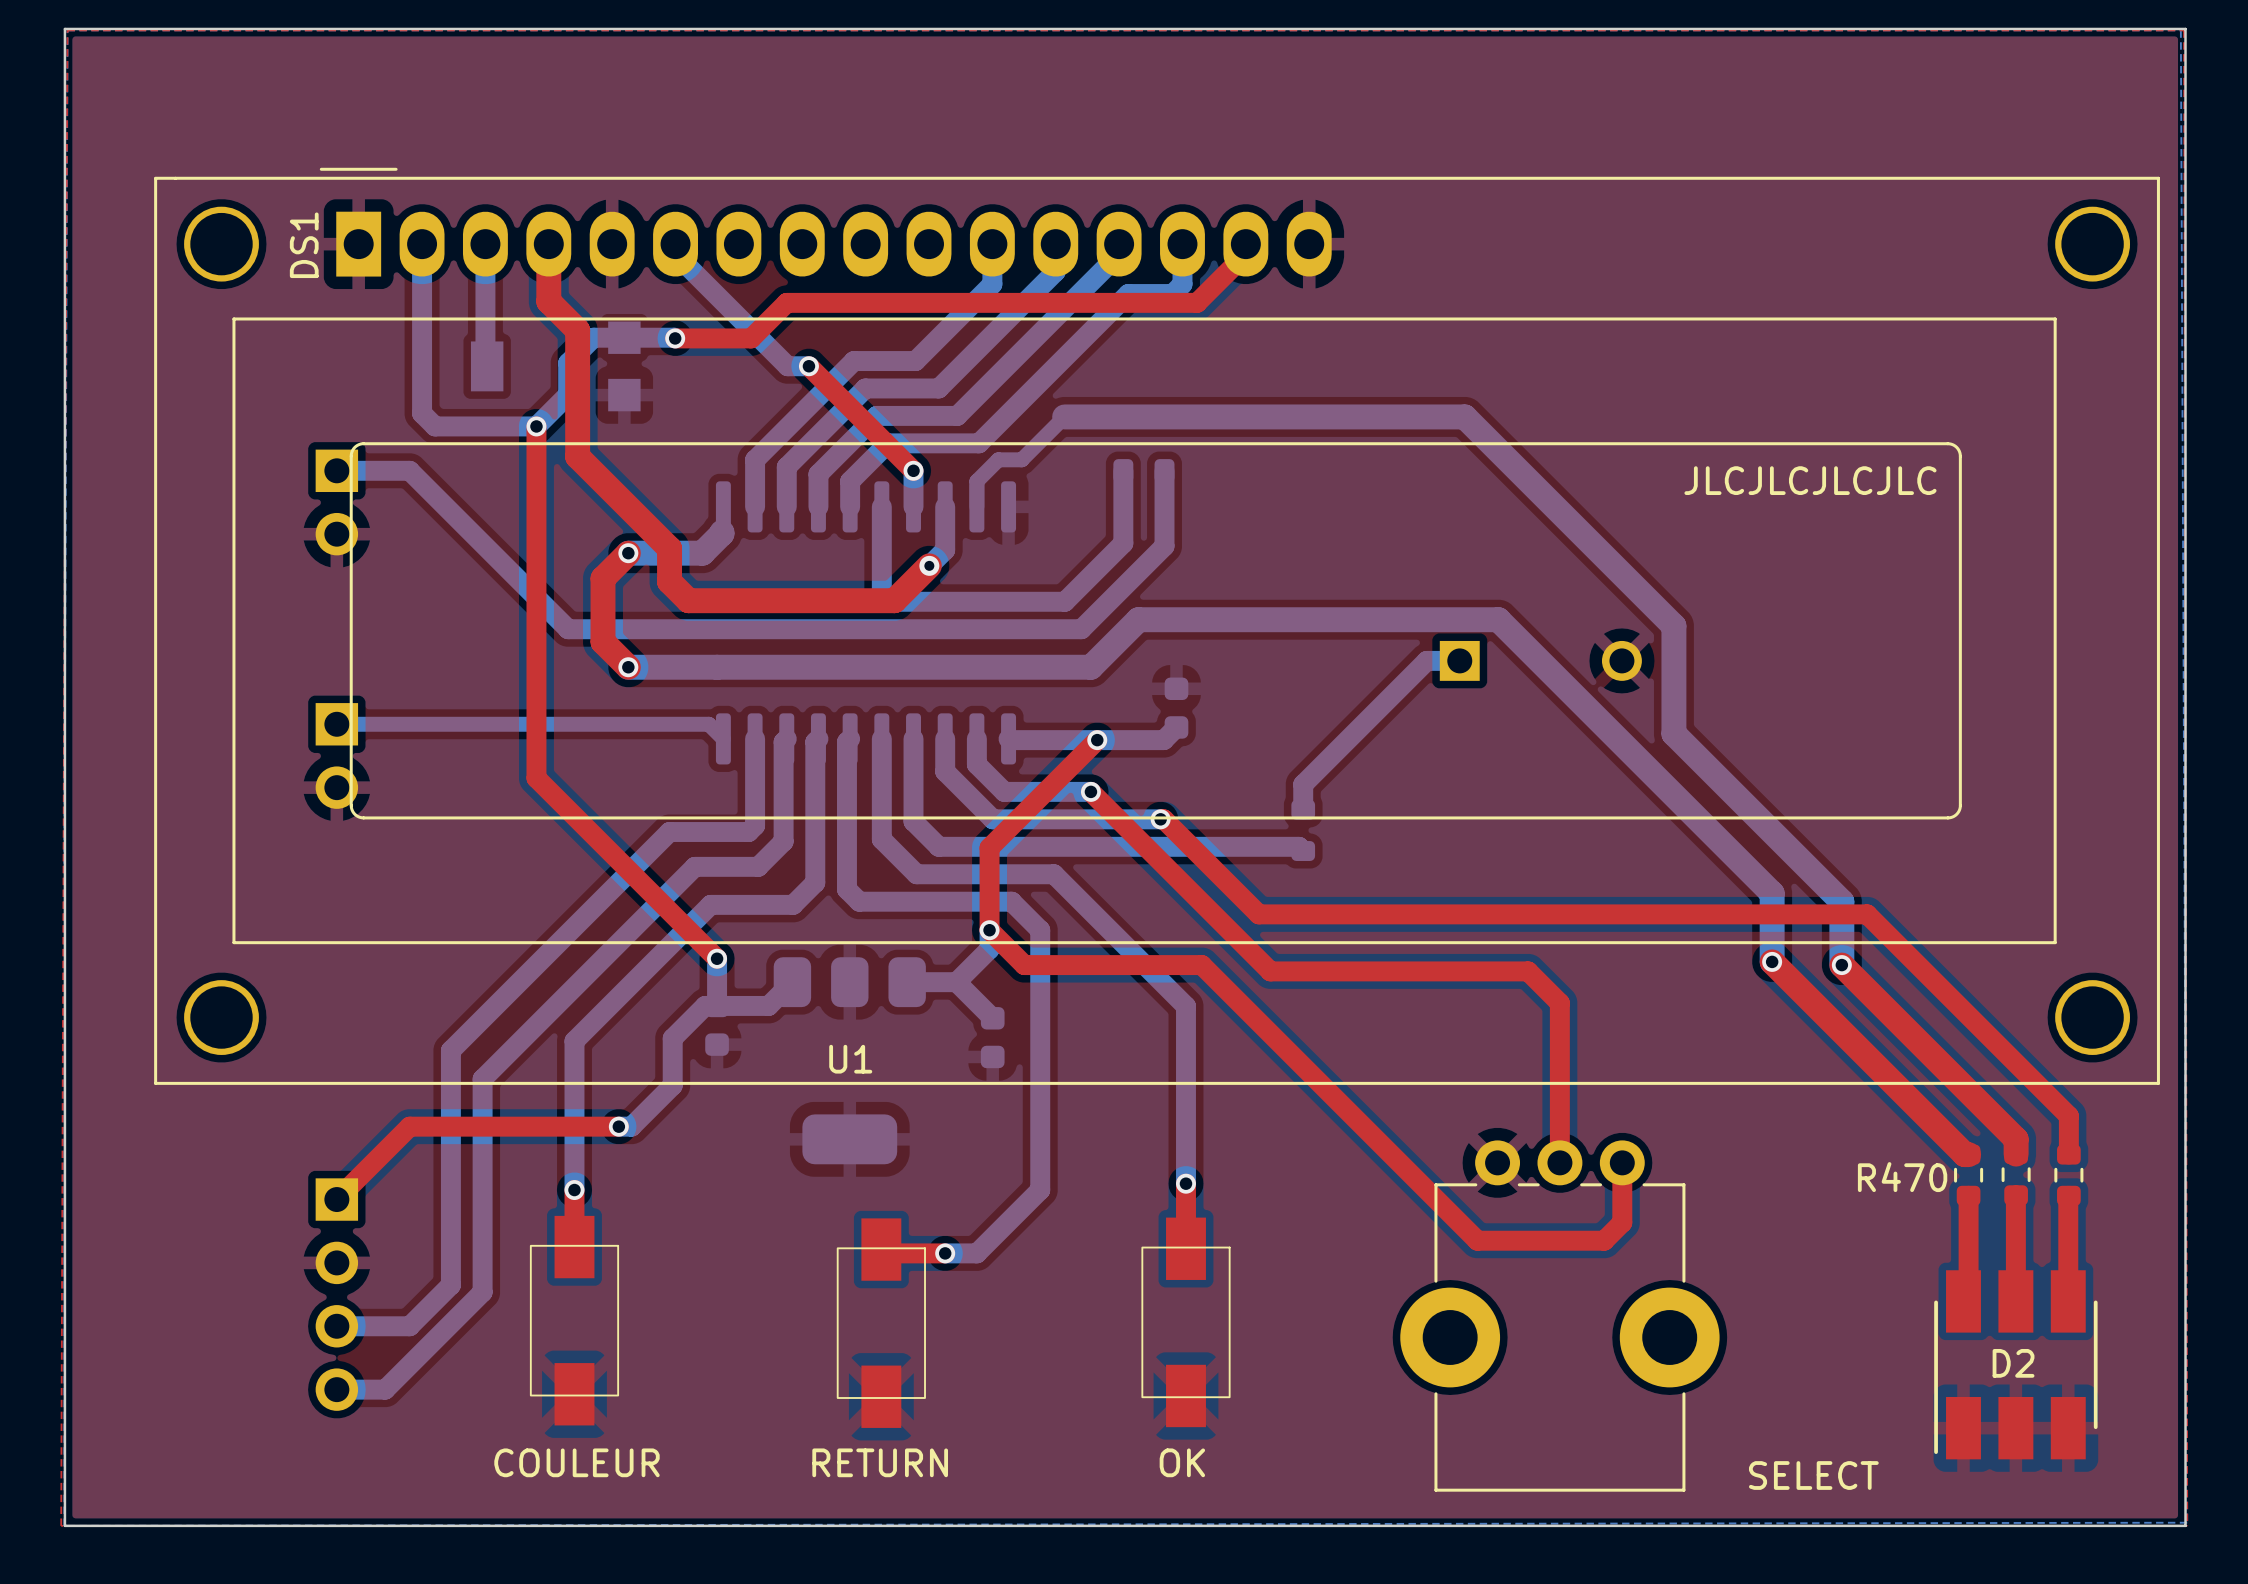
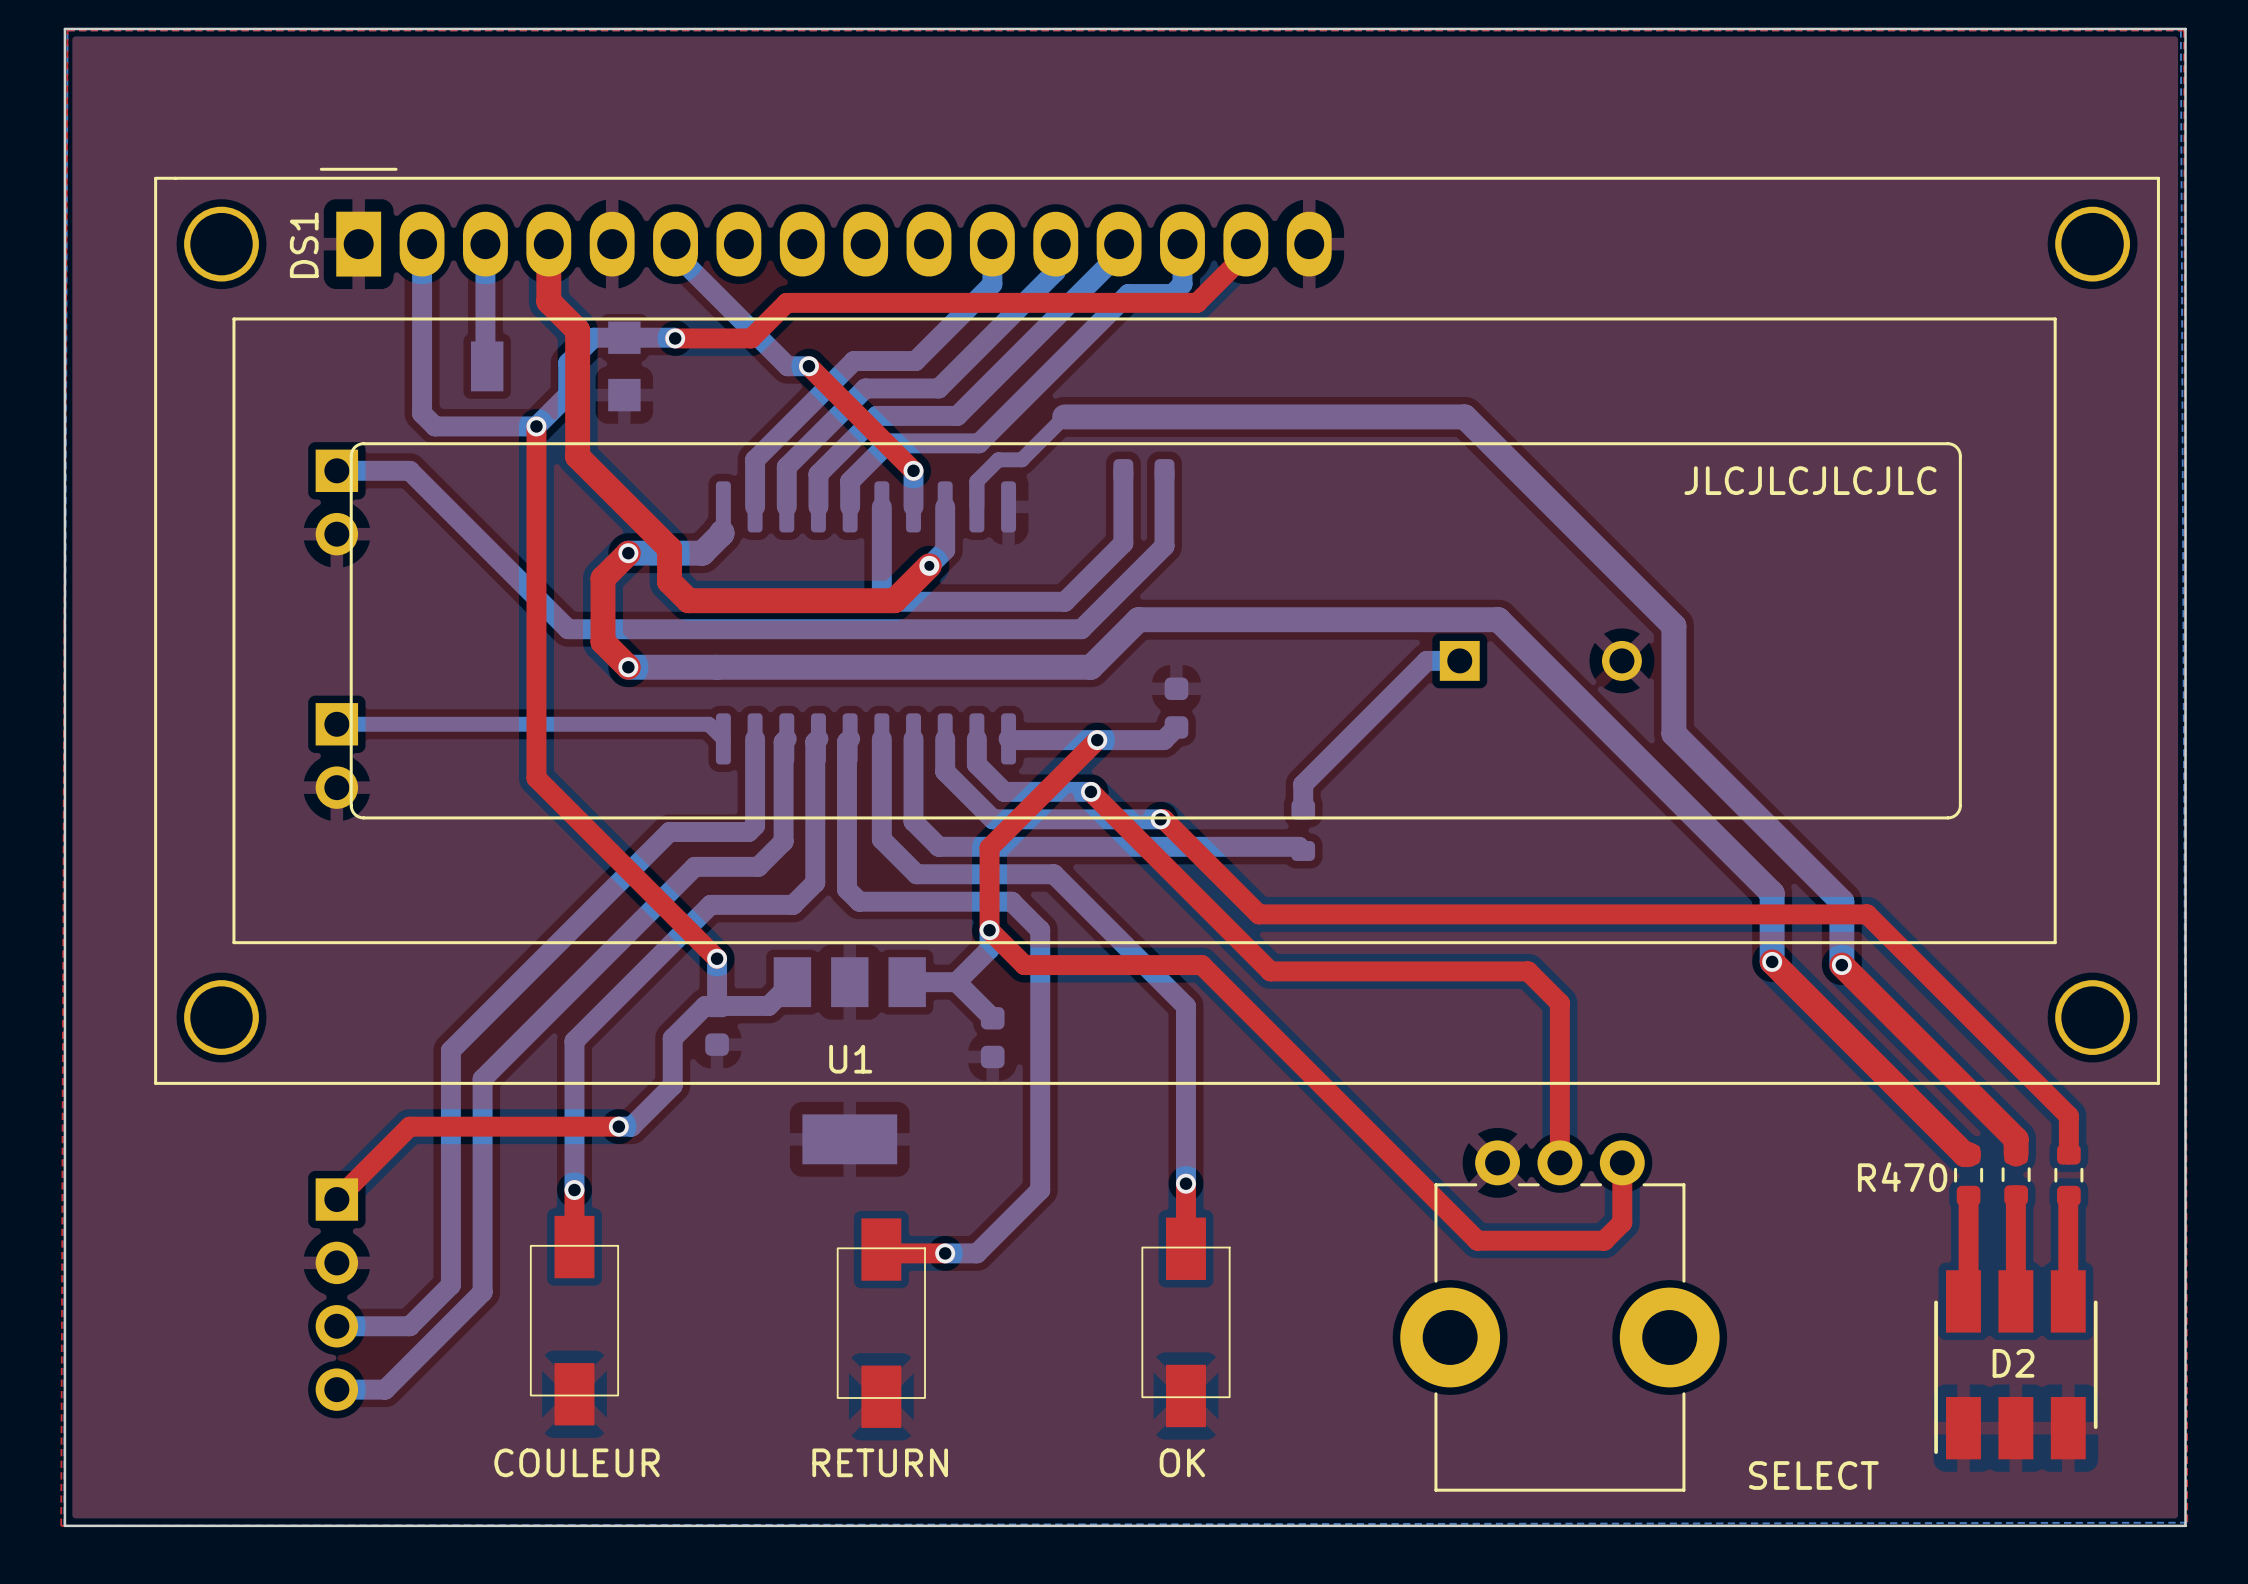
U1 footprint: [773, 957, 926, 1165] -> [773, 957, 926, 1165]

